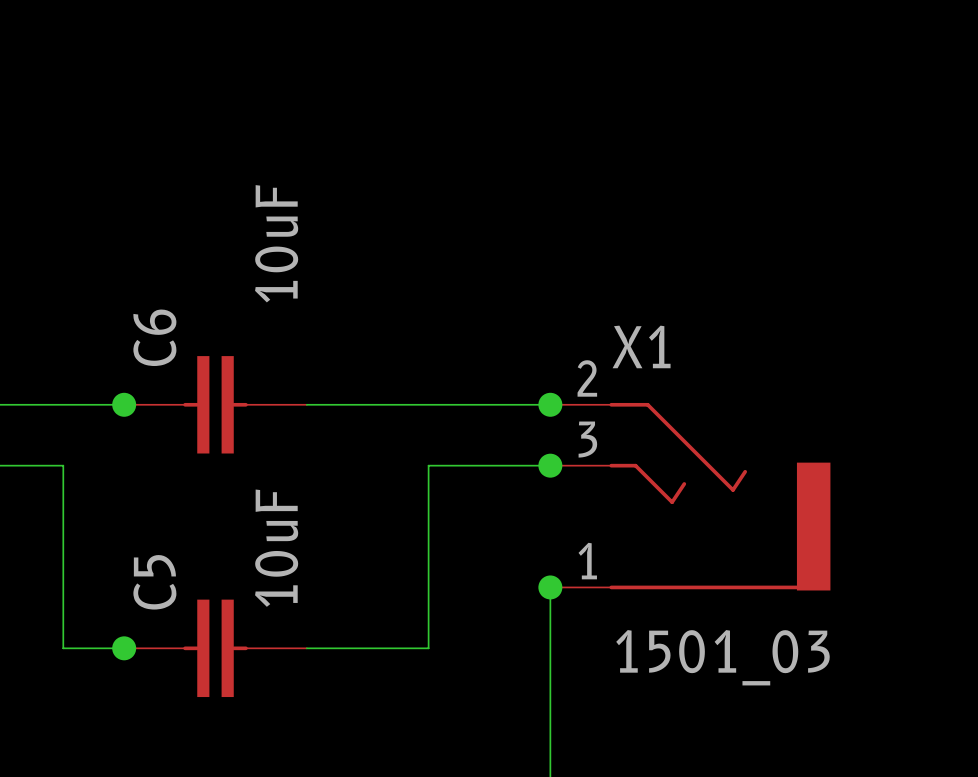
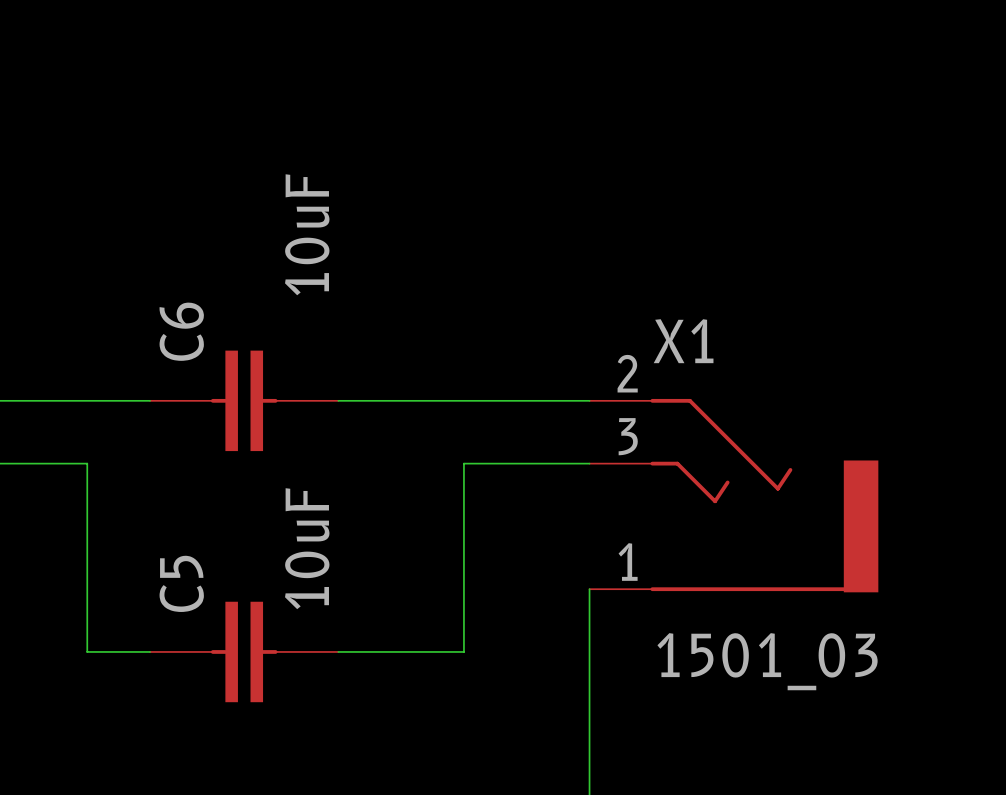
junction: (124, 404) -> none
junction: (550, 404) -> none
junction: (550, 465) -> none
junction: (550, 587) -> none
junction: (124, 648) -> none

